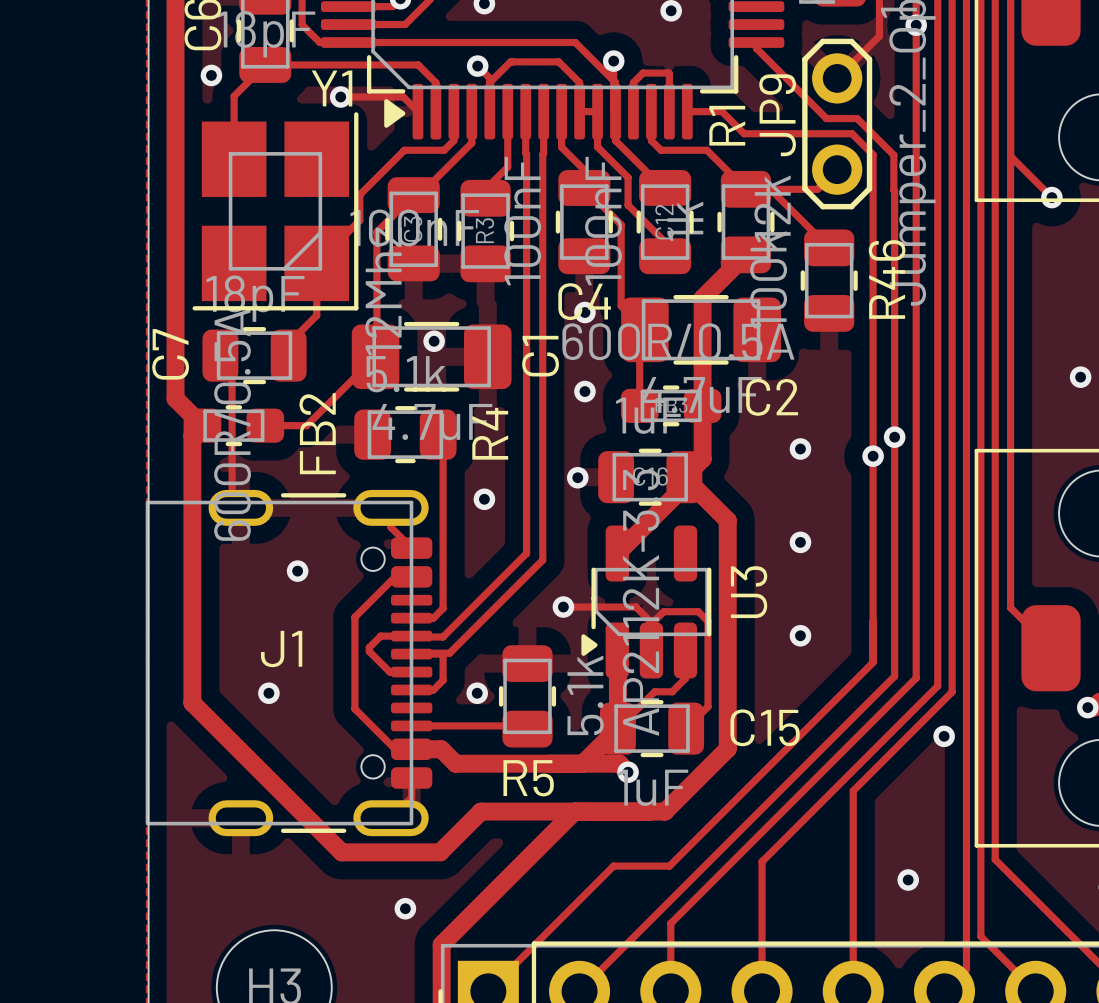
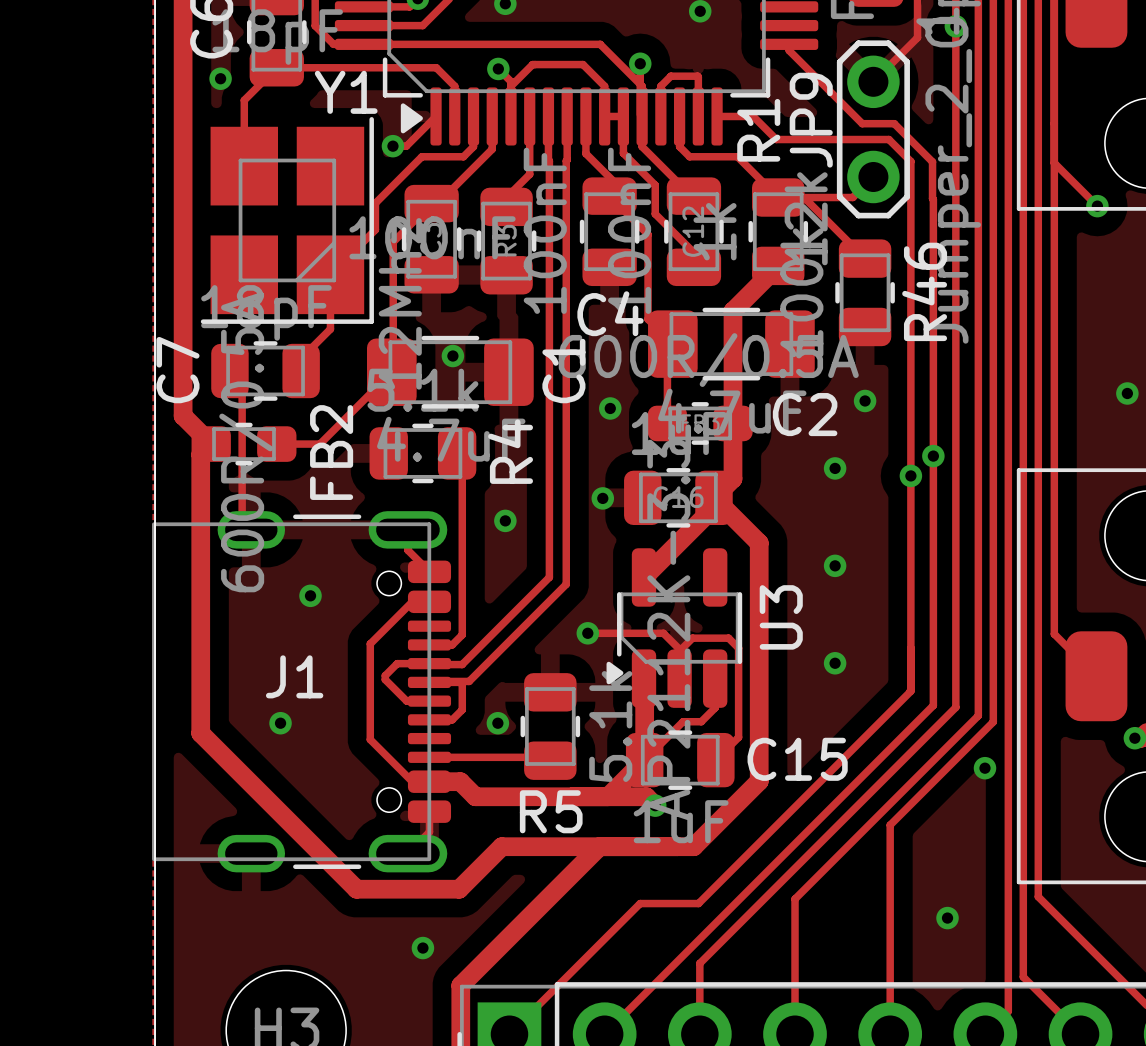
track: (340, 97) (403, 97) (417, 111) -> (392, 146) (406, 146) (436, 116)
via position: (340, 97) -> (392, 146)
via: (584, 312) -> none
via: none -> (865, 400)

